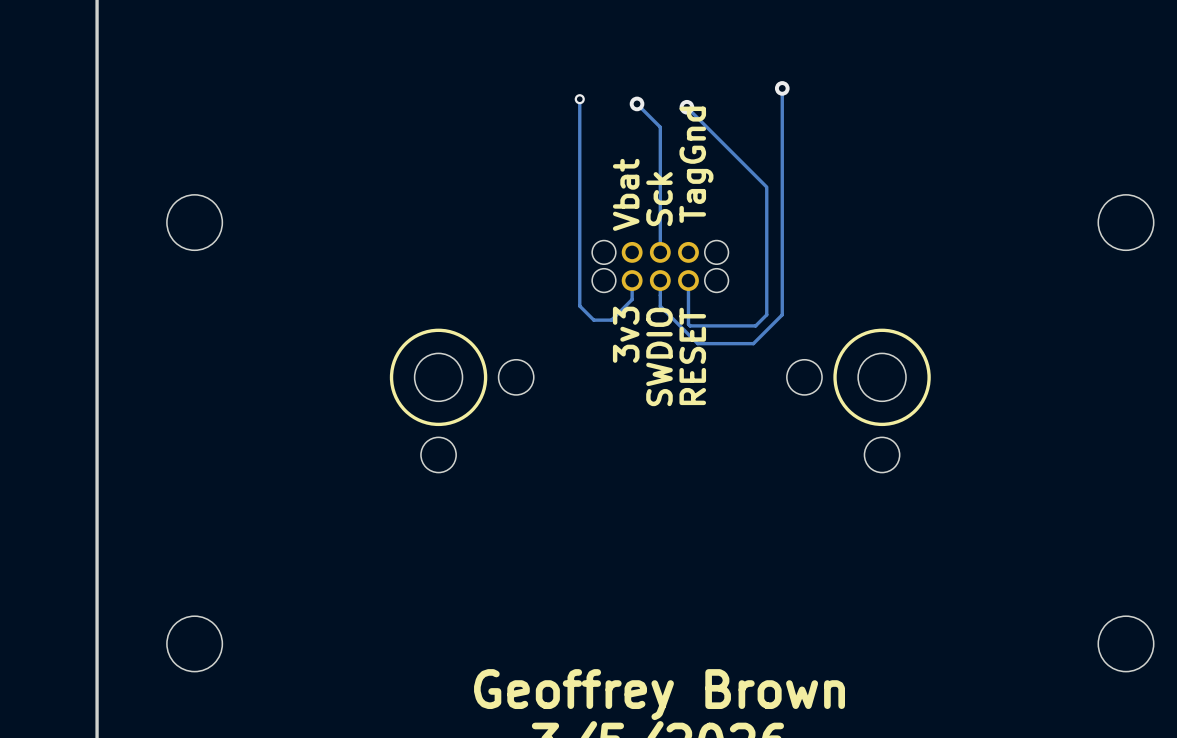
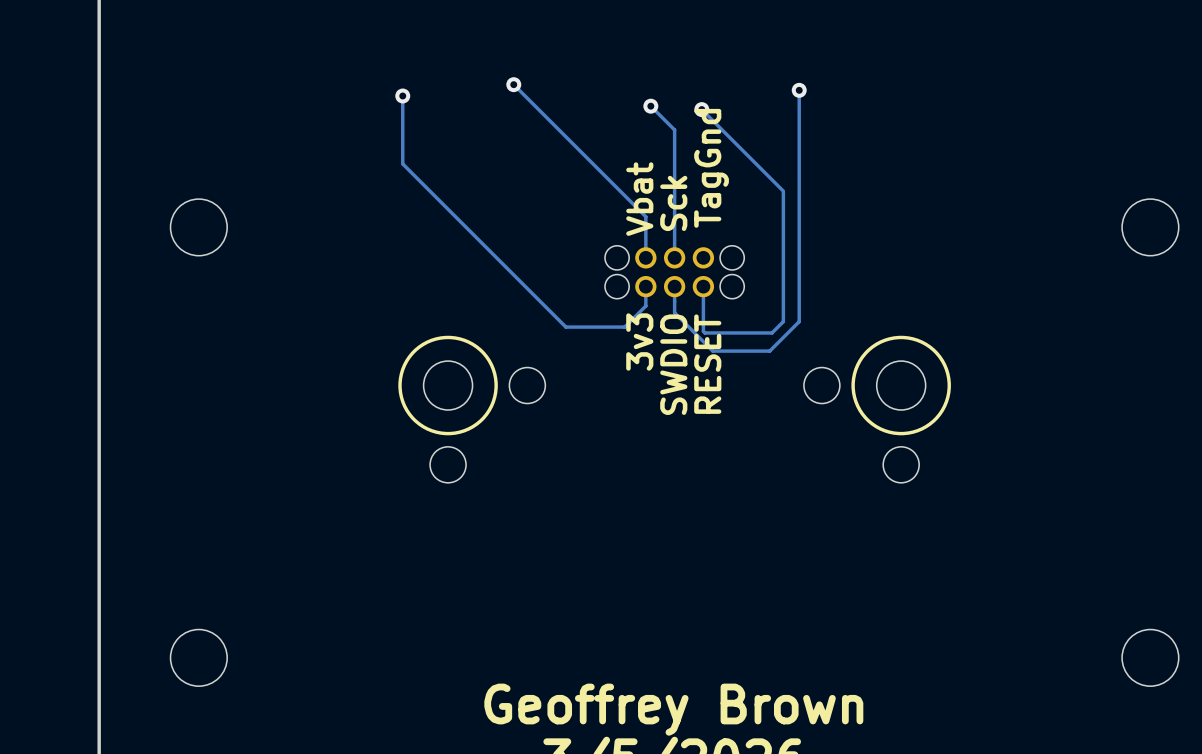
track: none -> (513, 84) (645, 216) (645, 257)
via: none -> (513, 84)
via: none -> (402, 95)
track: (579, 99) (579, 306) (593, 320) -> (402, 95) (402, 163) (565, 327) (606, 327)
via: (579, 99) -> none

